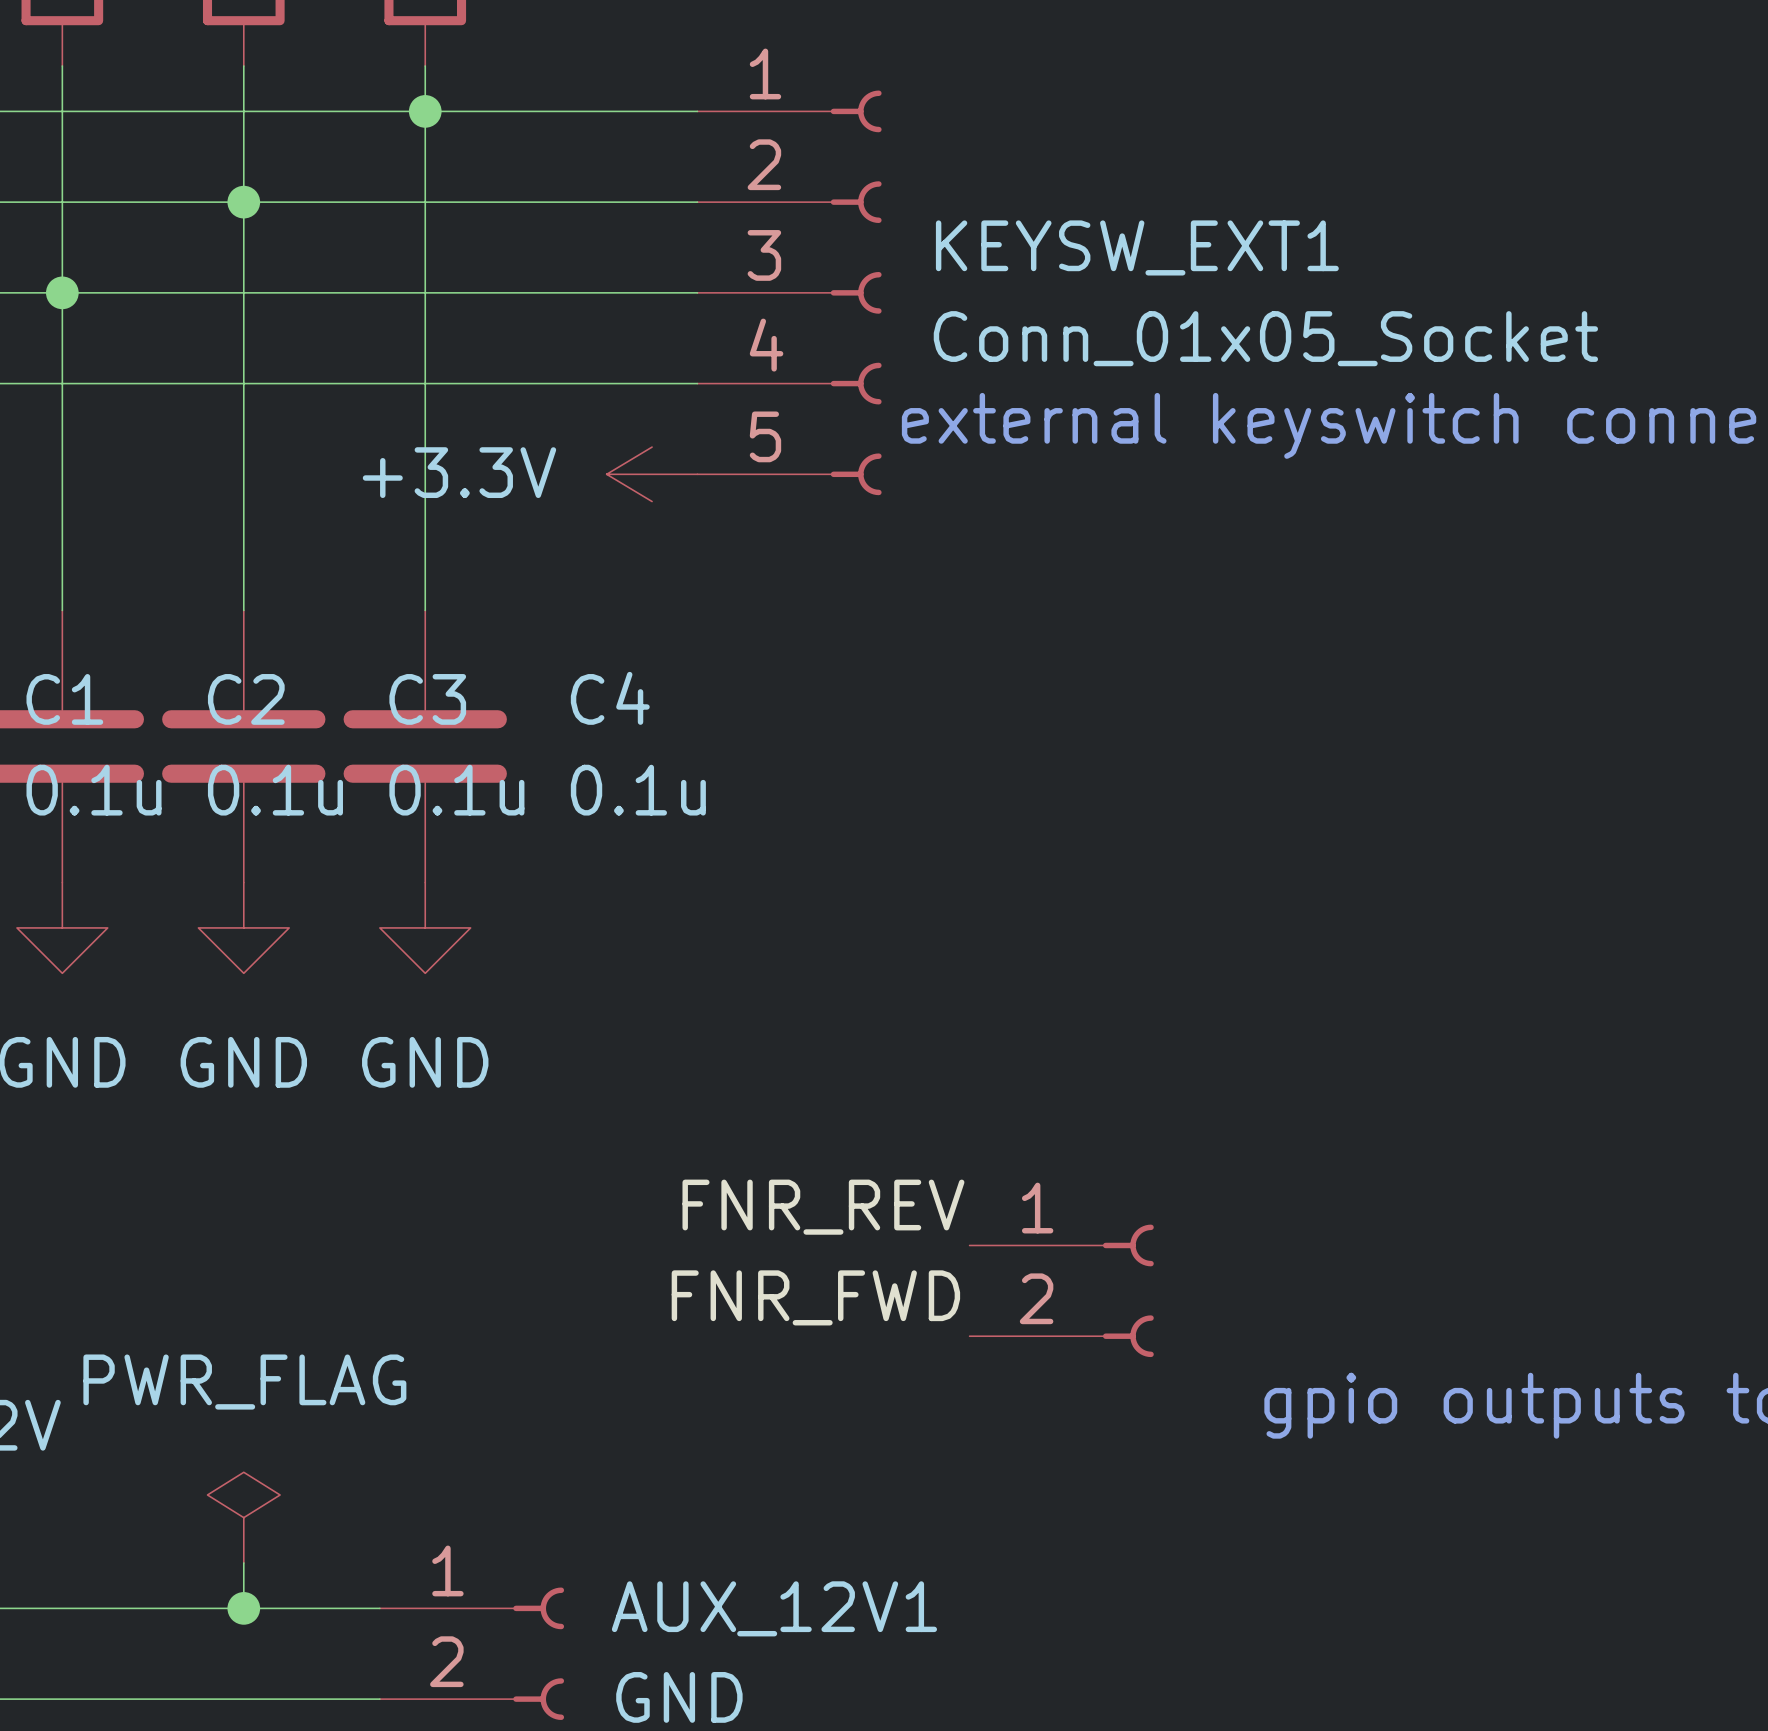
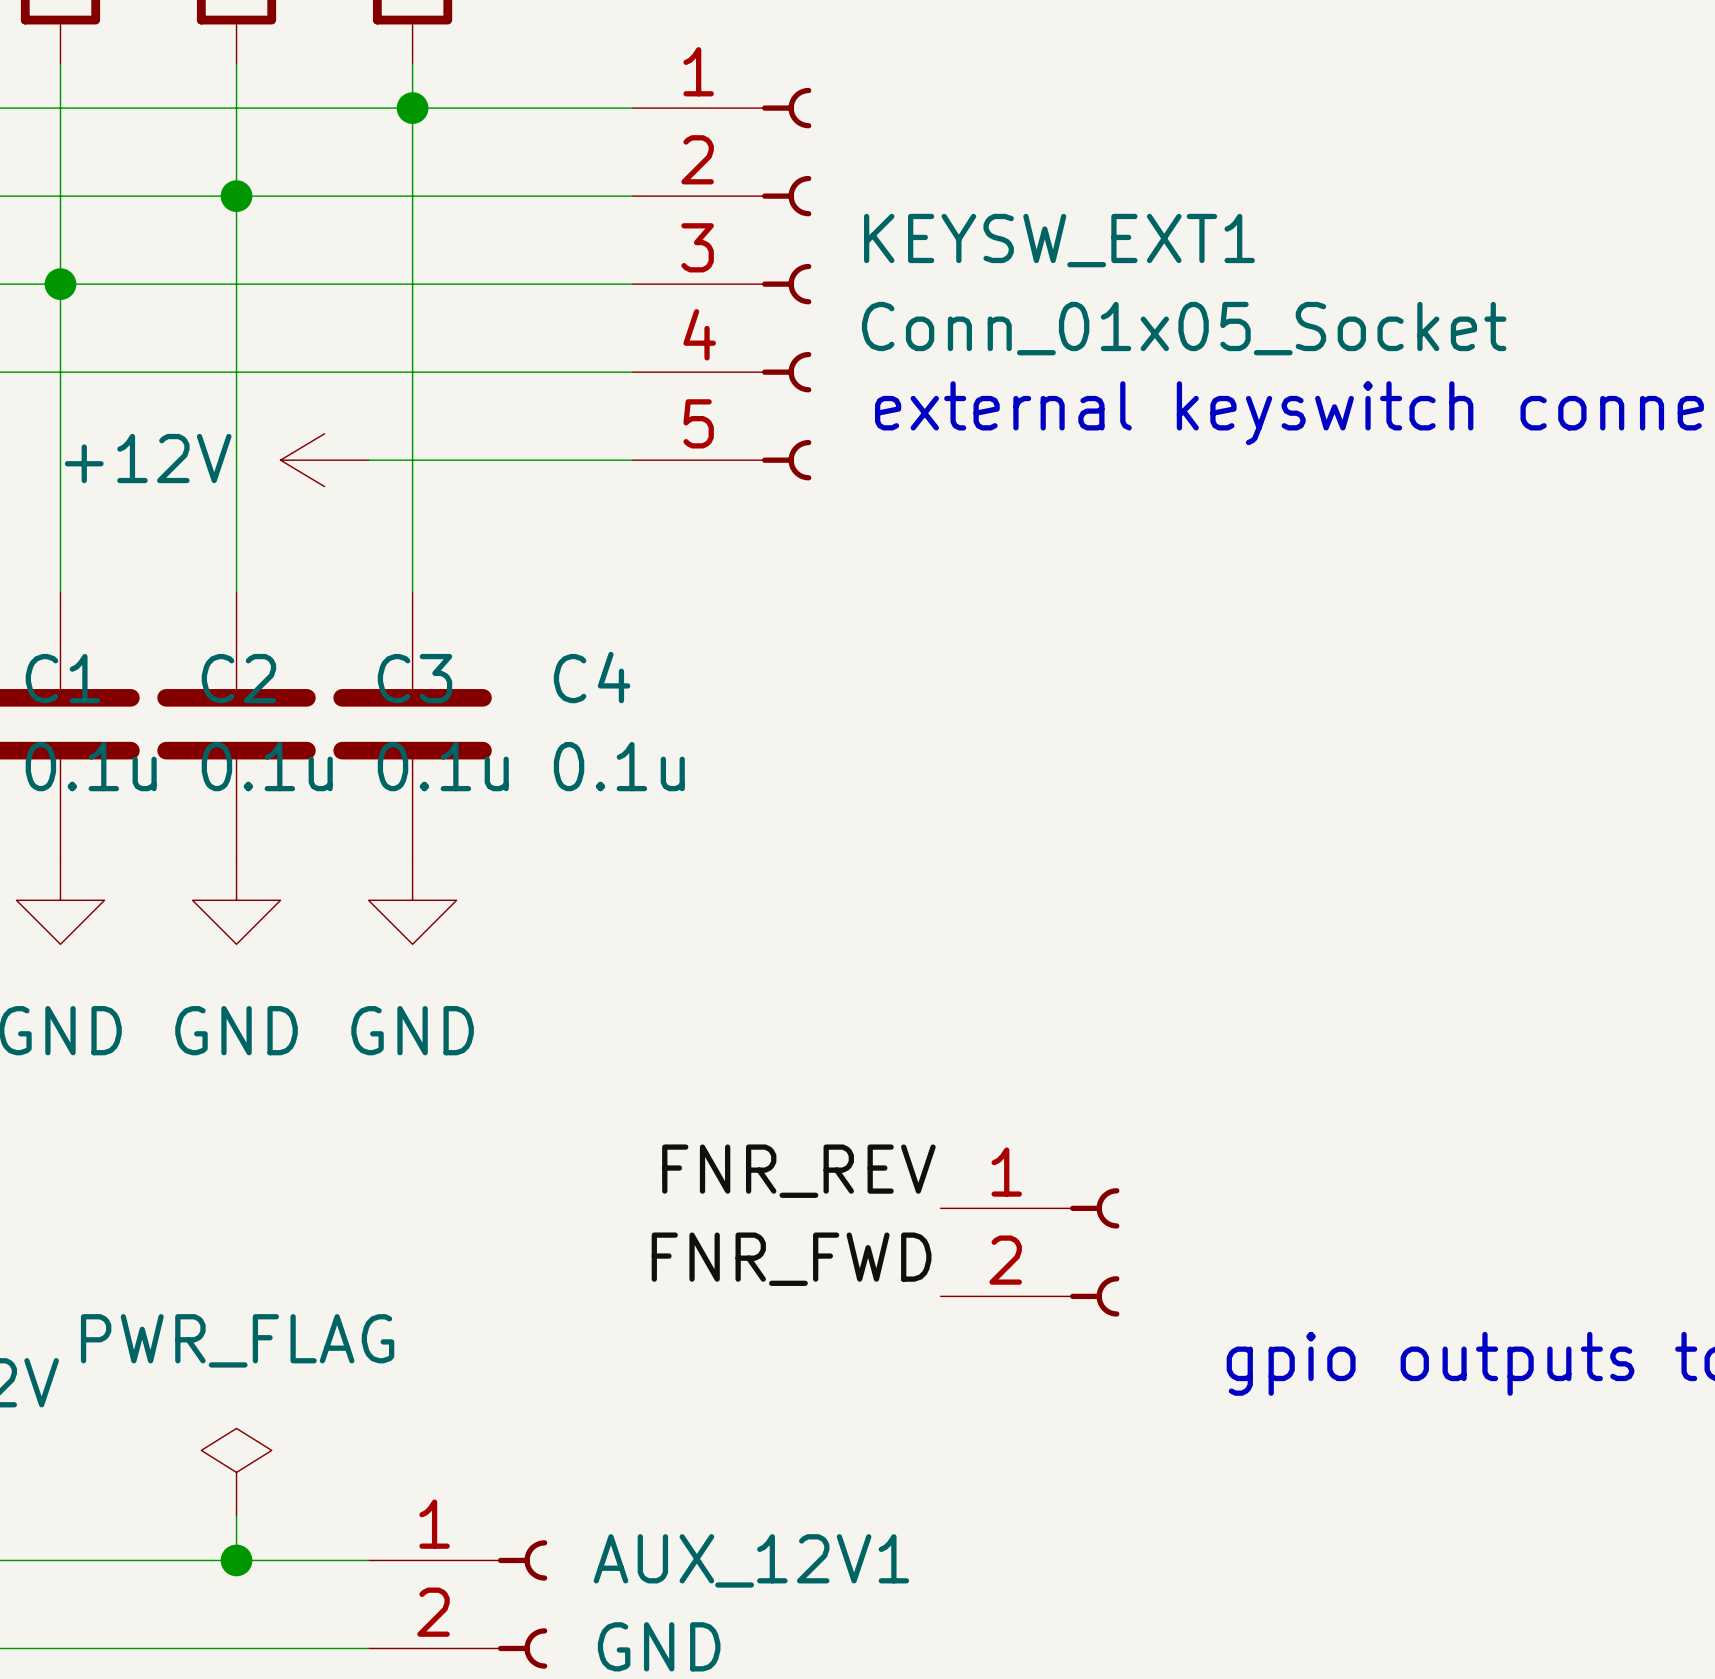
KEYSW_EXT1 position: (789, 292) -> (721, 284)
power symbol: none -> +12V (324, 460)
wire: none -> (368, 460) (632, 460)
power symbol: +3.3V (652, 474) -> none

